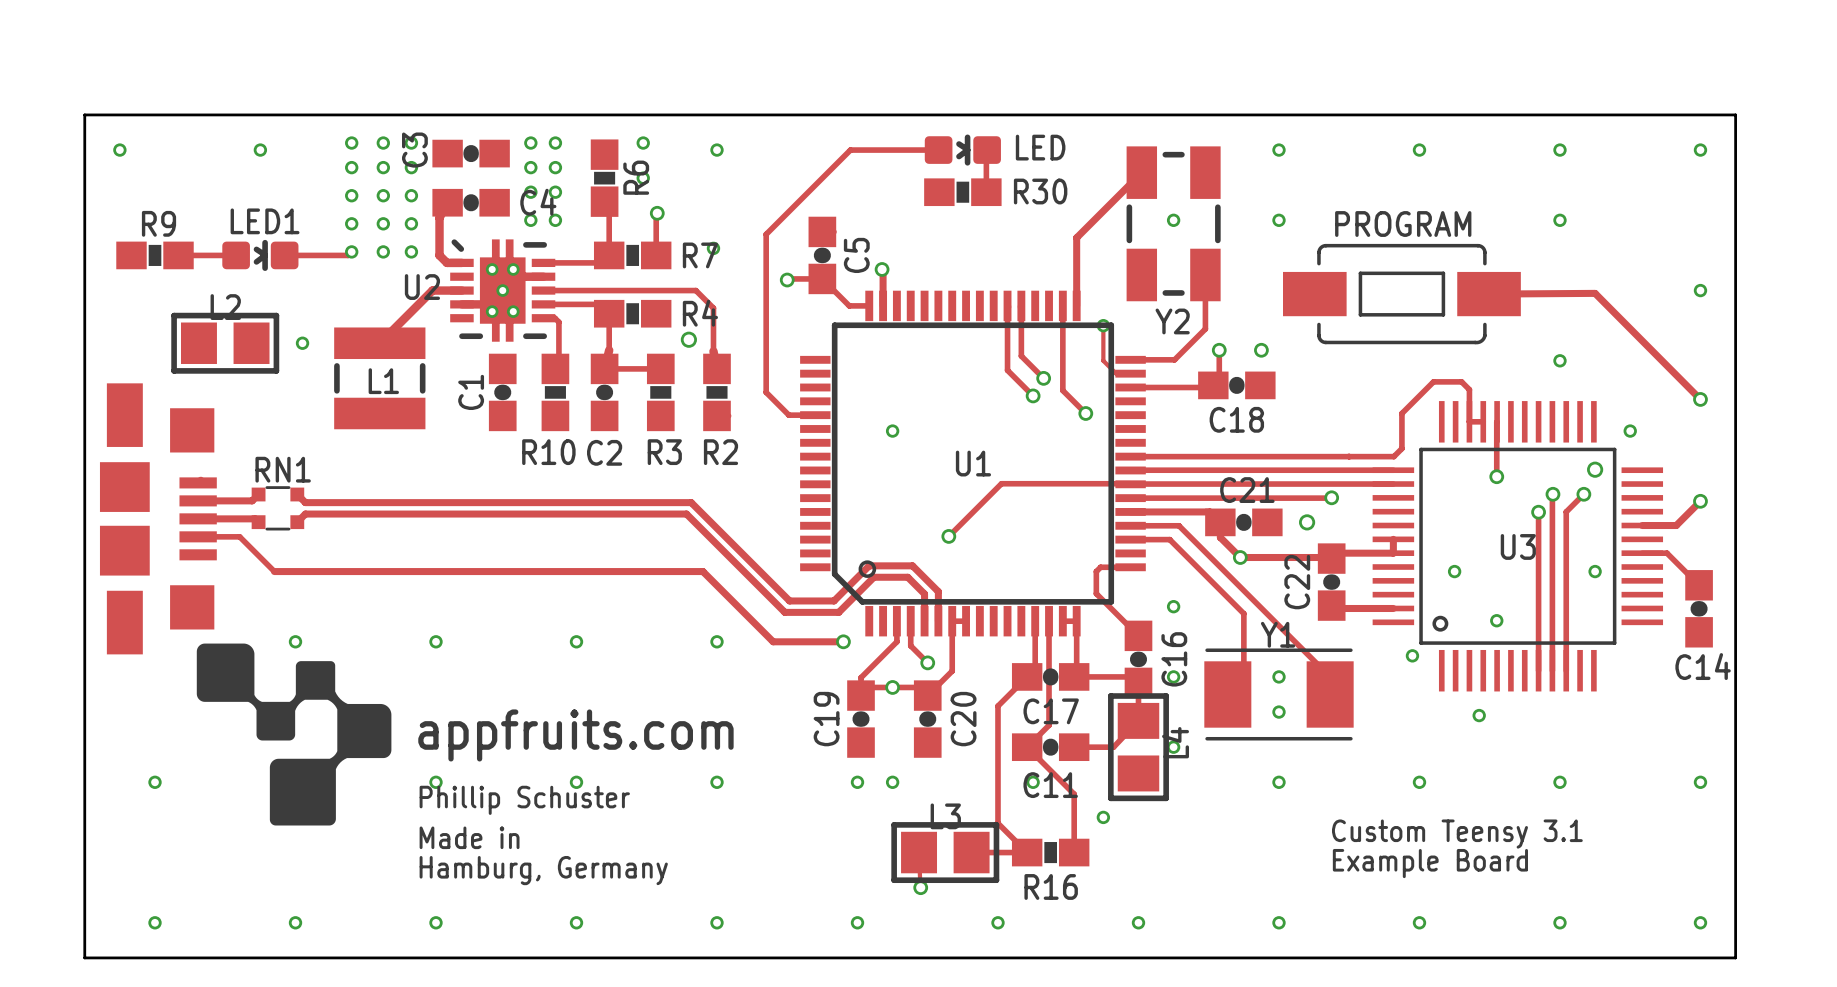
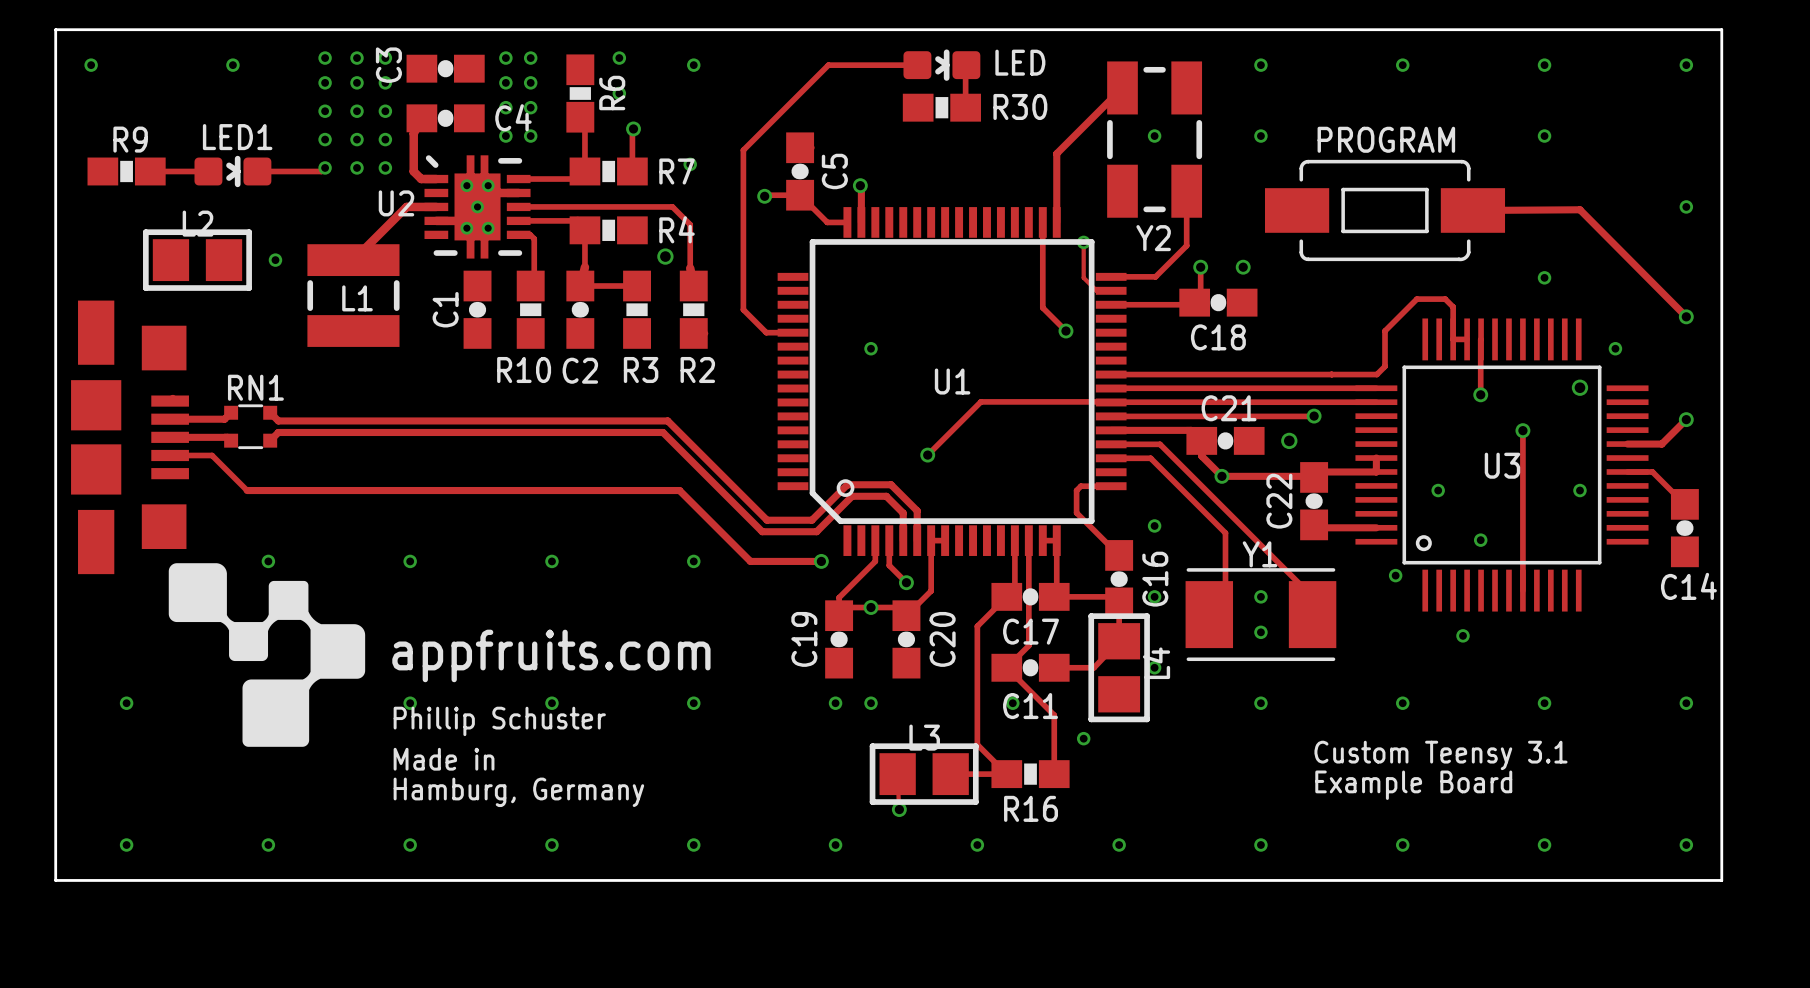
track: (1007, 306) (1007, 370) (1033, 395) -> none
track: (1021, 307) (1021, 356) (1043, 378) -> none
via: (1043, 378) -> none
via: (1033, 395) -> none
track: (1552, 494) (1552, 670) -> none
via: (1552, 494) -> none
track: (1583, 494) (1566, 511) (1566, 670) -> none
via: (1583, 494) -> none

